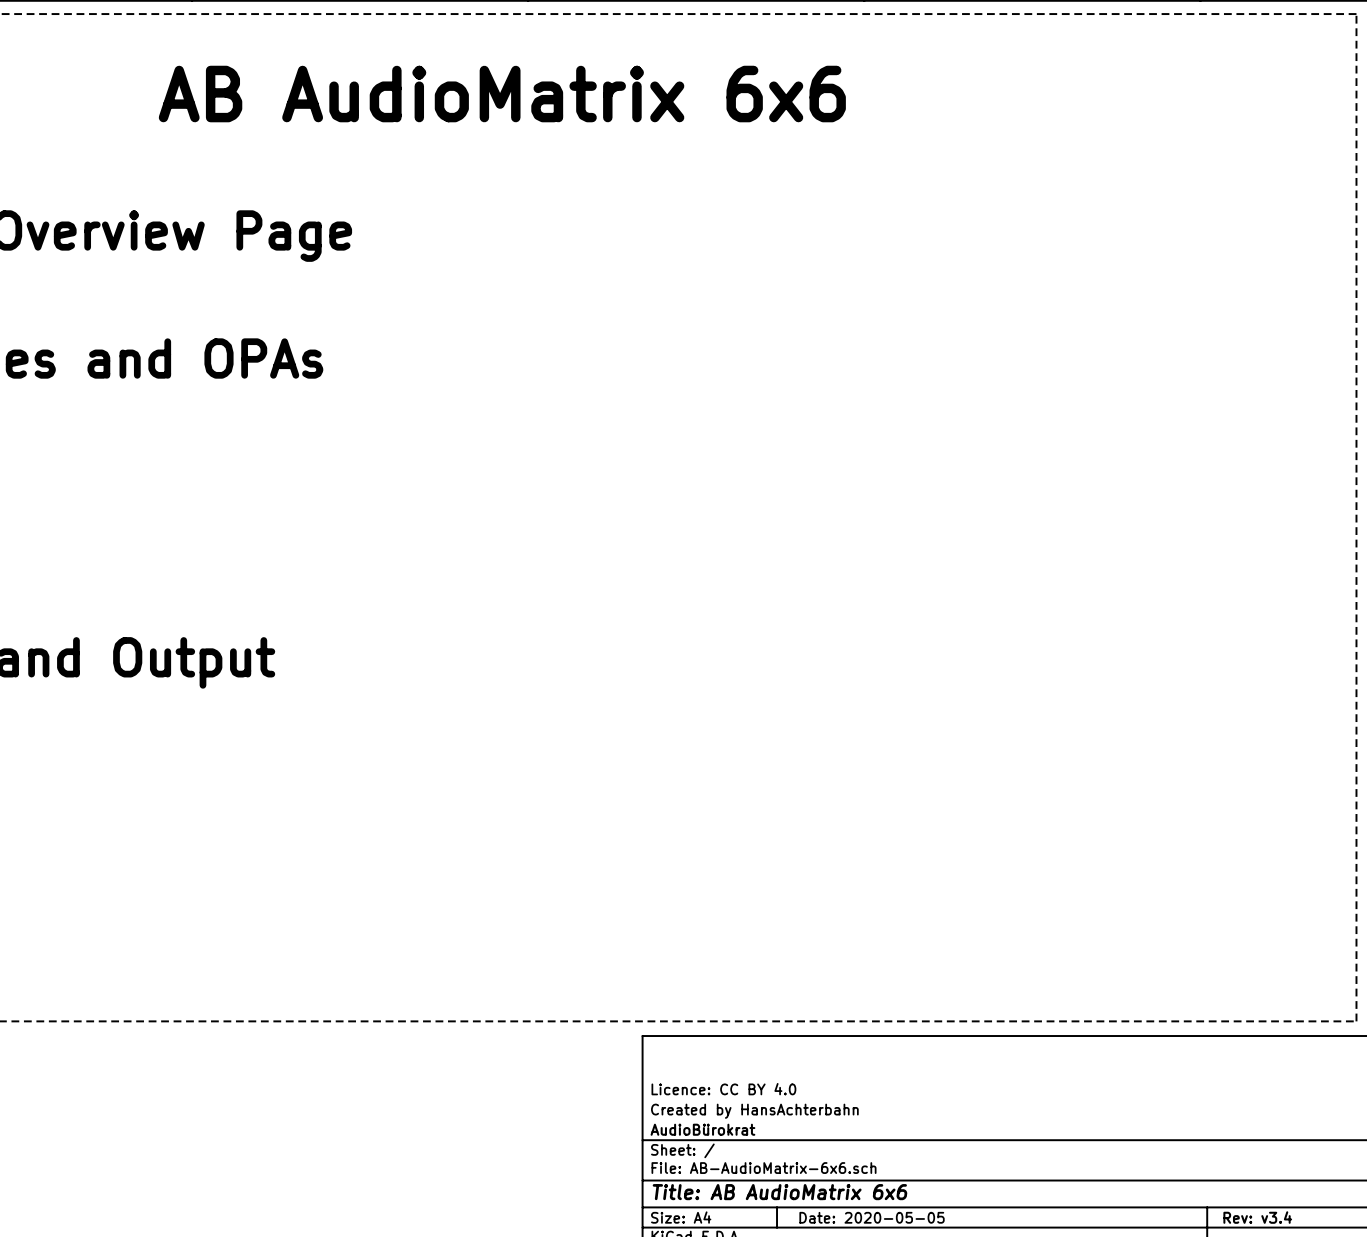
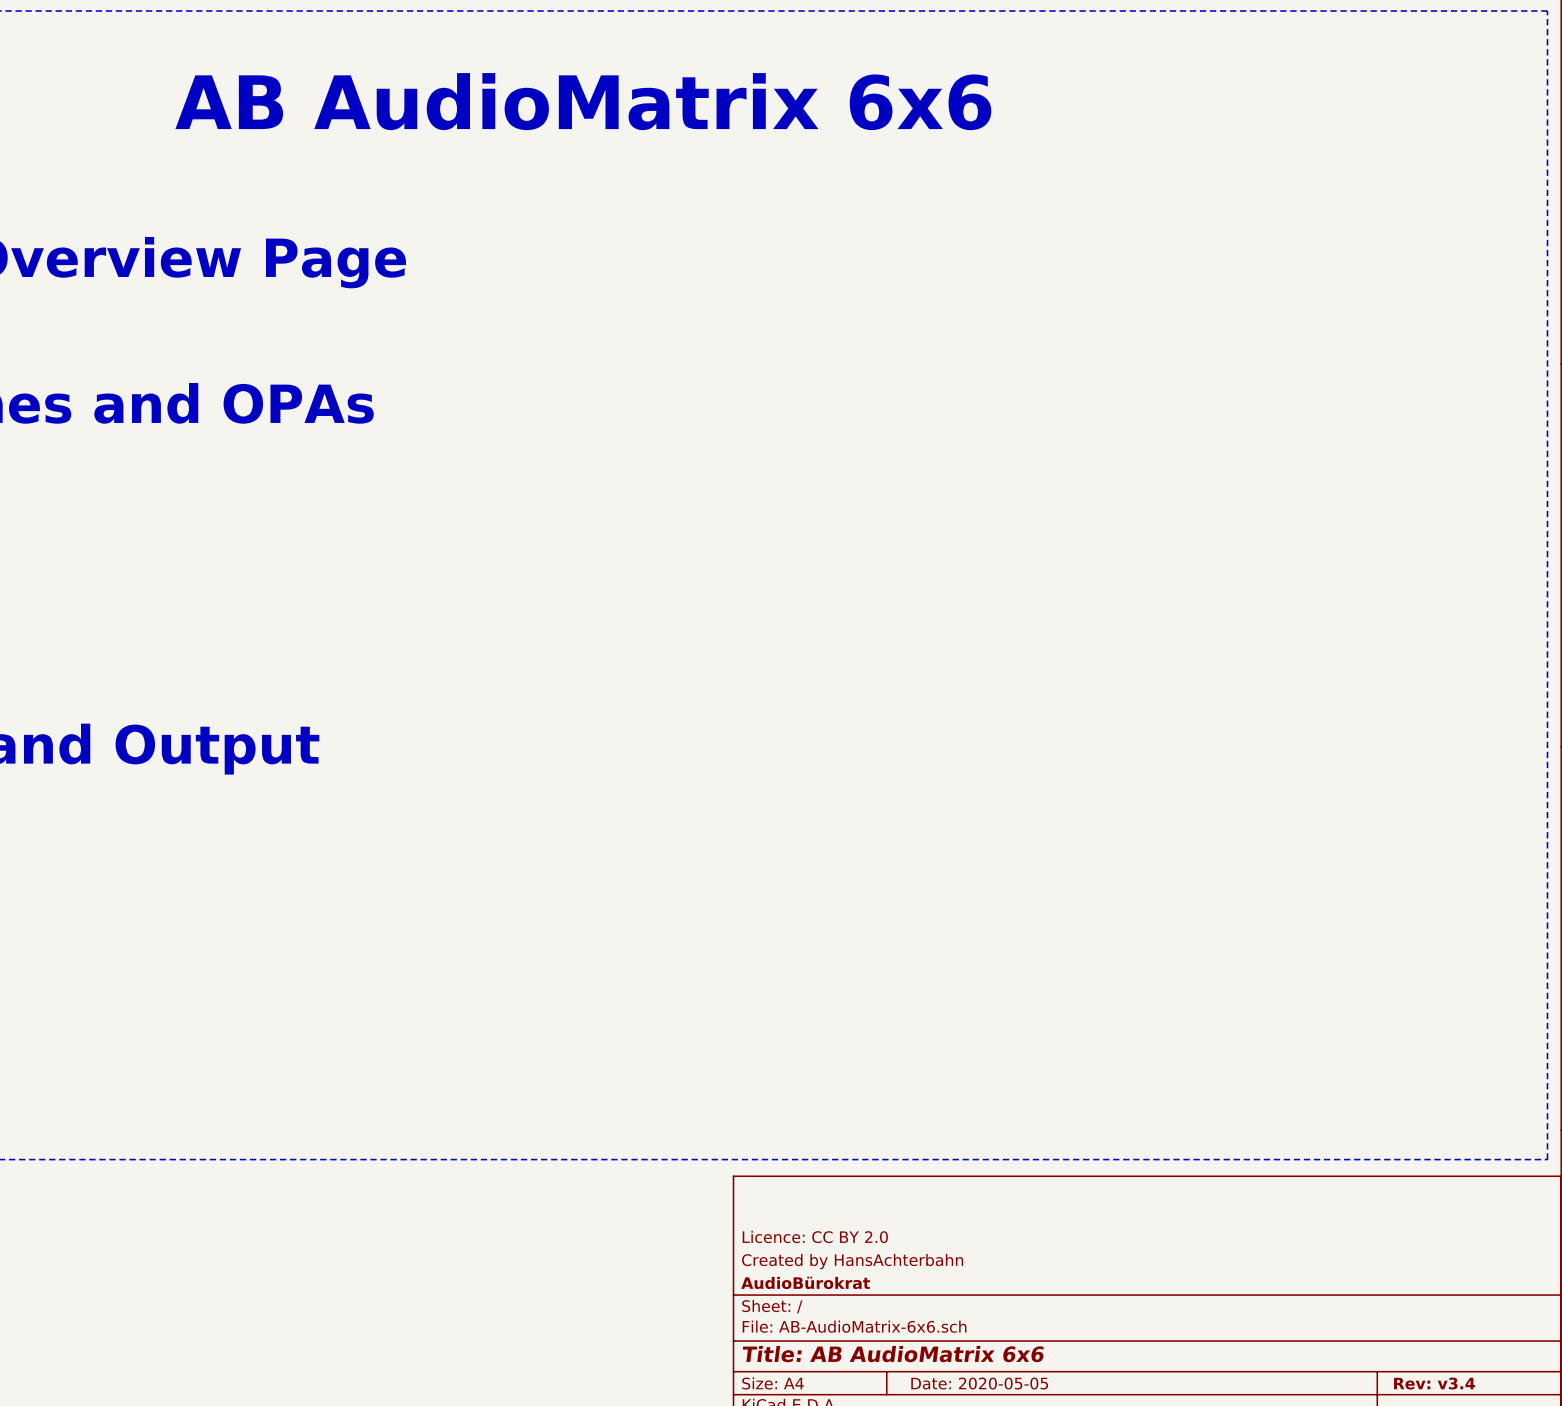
title block: Licence: CC BY 4.0 (723, 1089) -> Licence: CC BY 2.0 (815, 1237)

